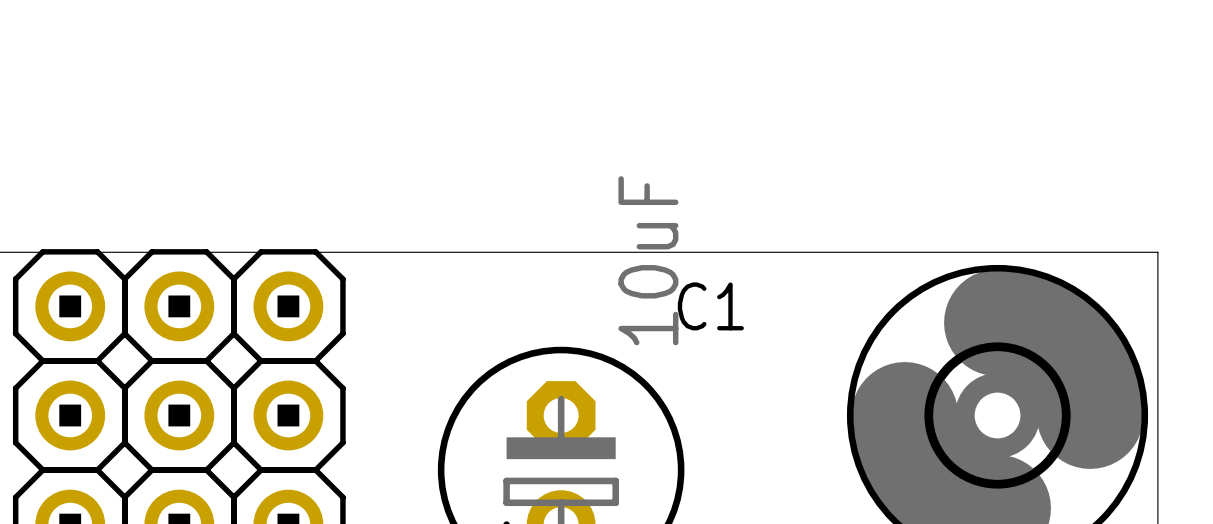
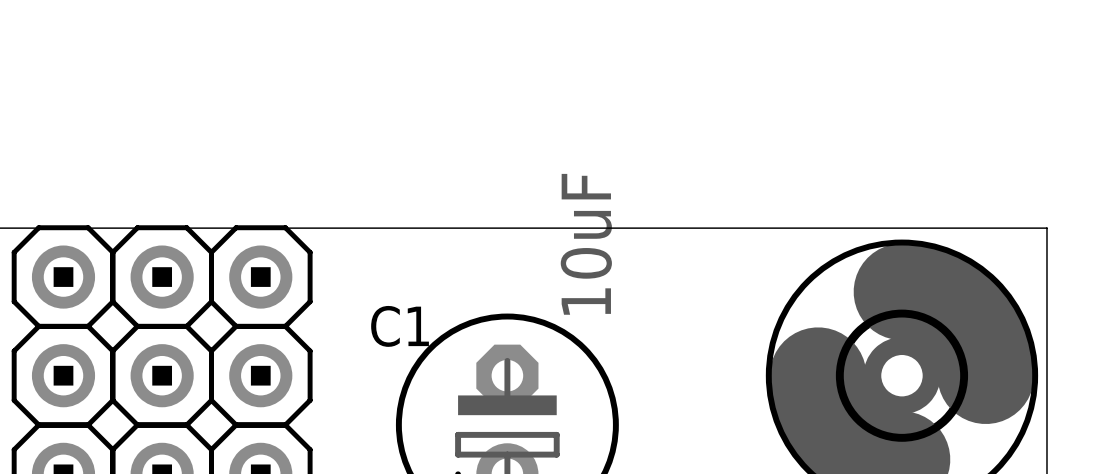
C1 name position: C1 (710, 306) -> C1 (400, 326)

